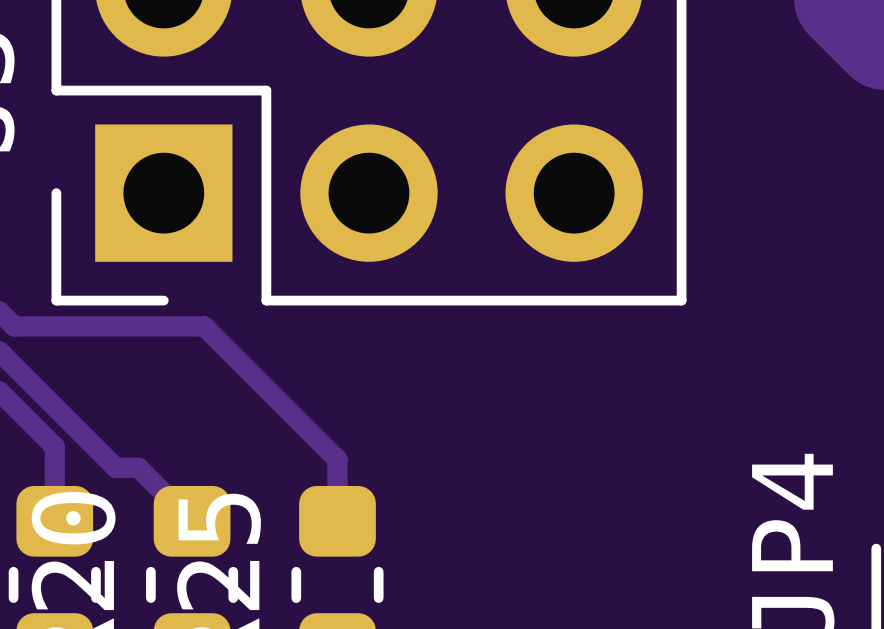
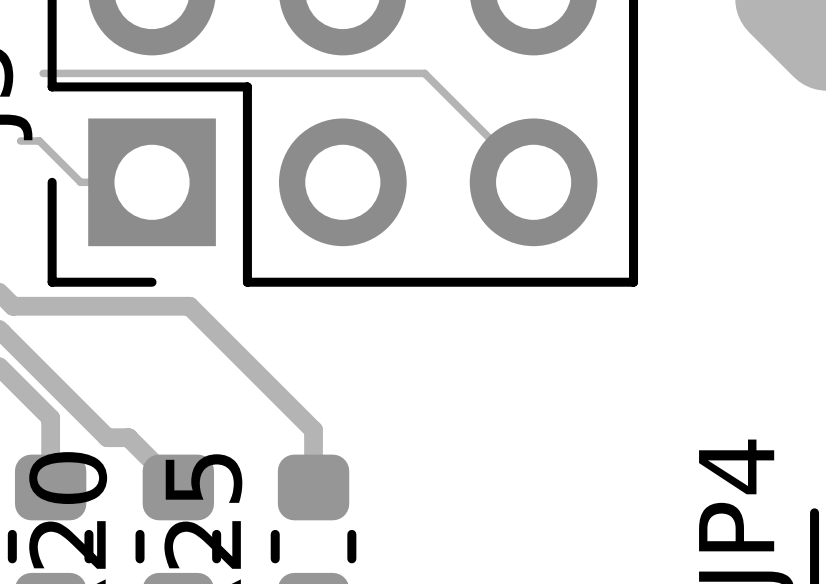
track: none -> (43, 73) (424, 73) (533, 182)
track: none -> (20, 141) (39, 141) (80, 182) (152, 182)

